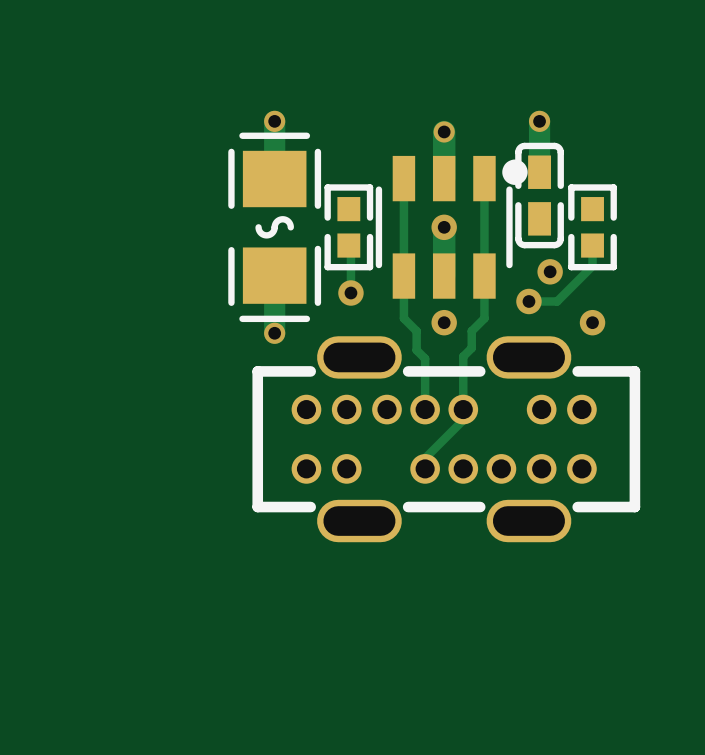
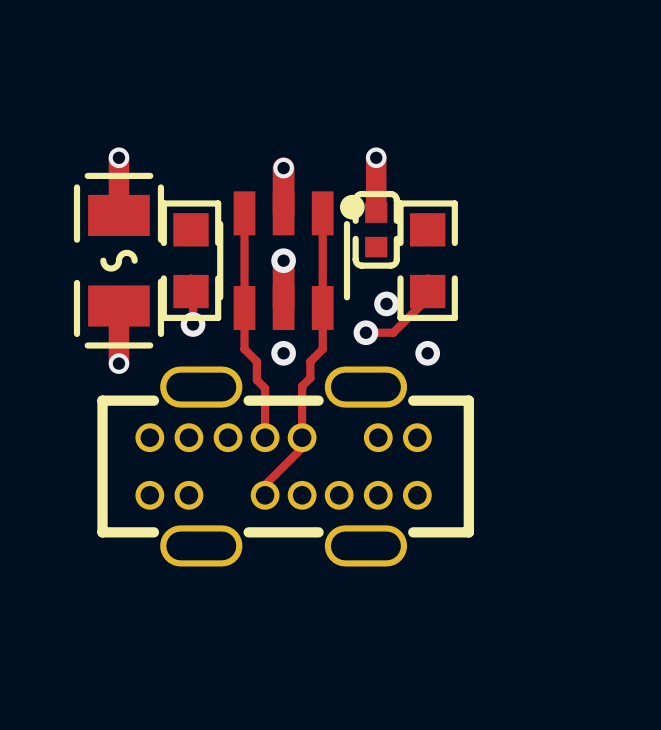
part footprint: [228, 132, 322, 323] -> [73, 172, 165, 349]
part footprint: [515, 142, 564, 249] -> [352, 190, 400, 269]
part footprint: [324, 184, 374, 271] -> [160, 200, 222, 322]
part footprint: [568, 184, 617, 271] -> [397, 200, 458, 322]

